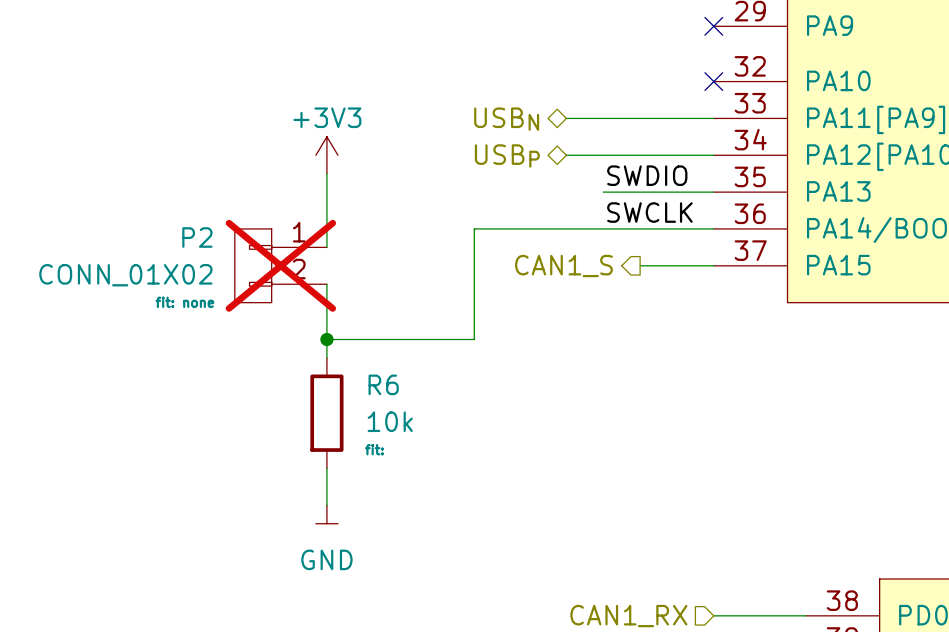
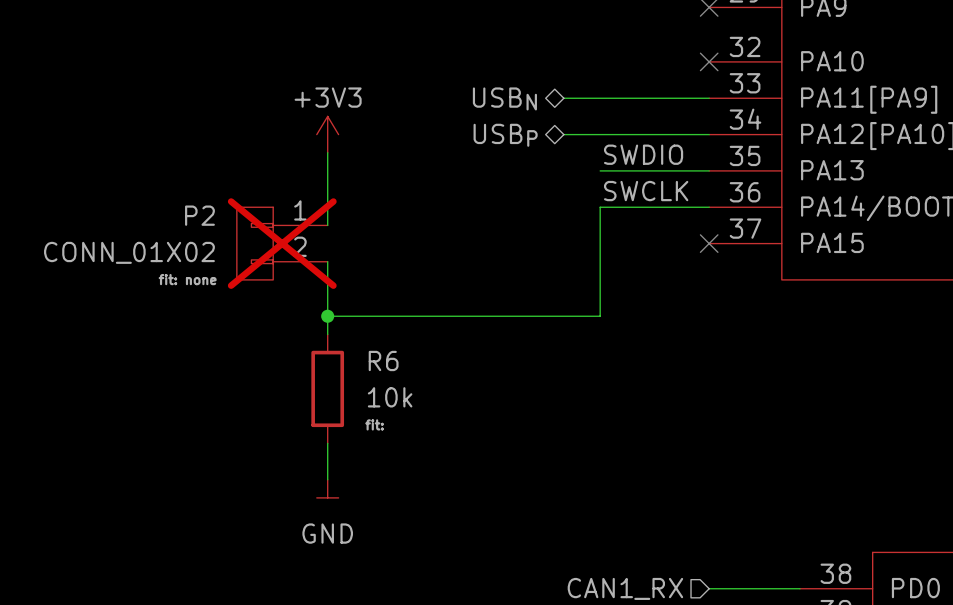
wire: (603, 228) (474, 228) (474, 339) -> (600, 207) (600, 316) (473, 316)
wire: (640, 265) (713, 265) -> none
no-connect mark: none -> (709, 243)
hierarchical label: CAN1_S (563, 266) -> none

